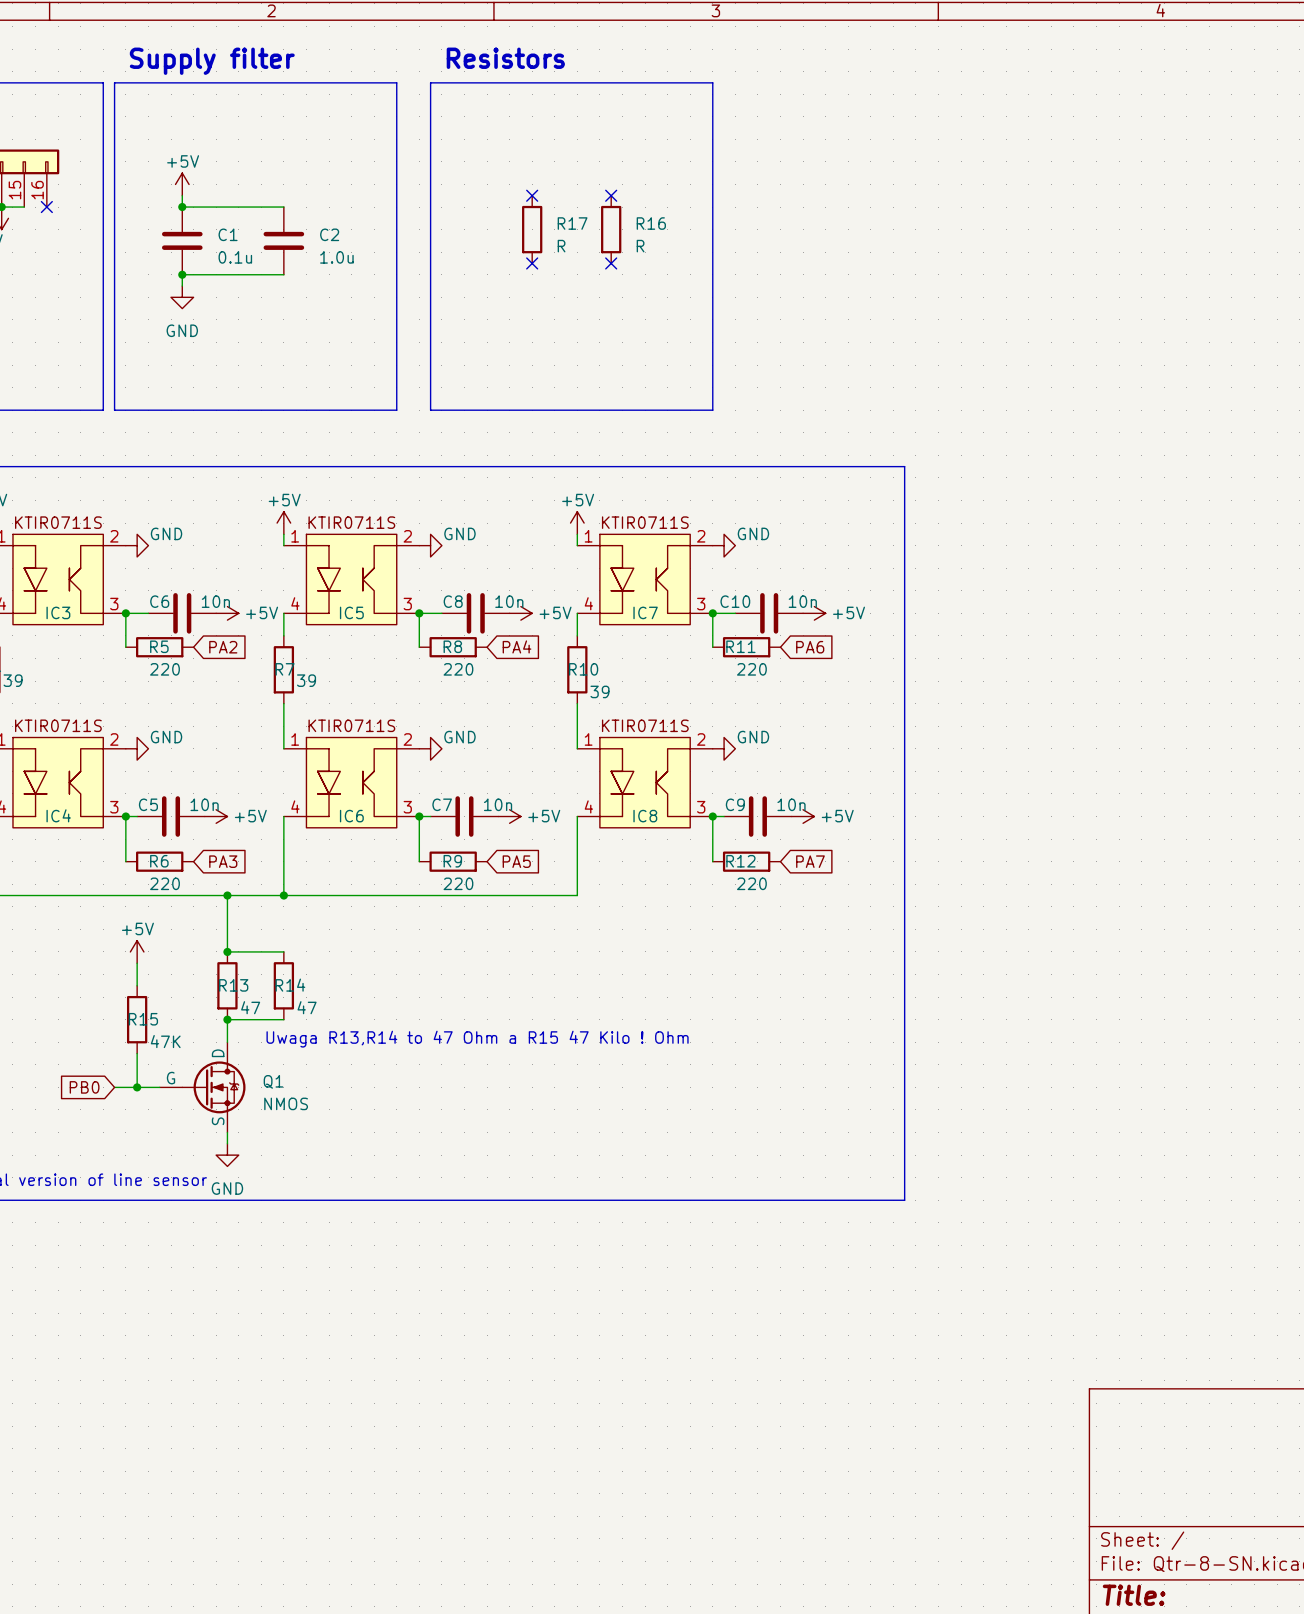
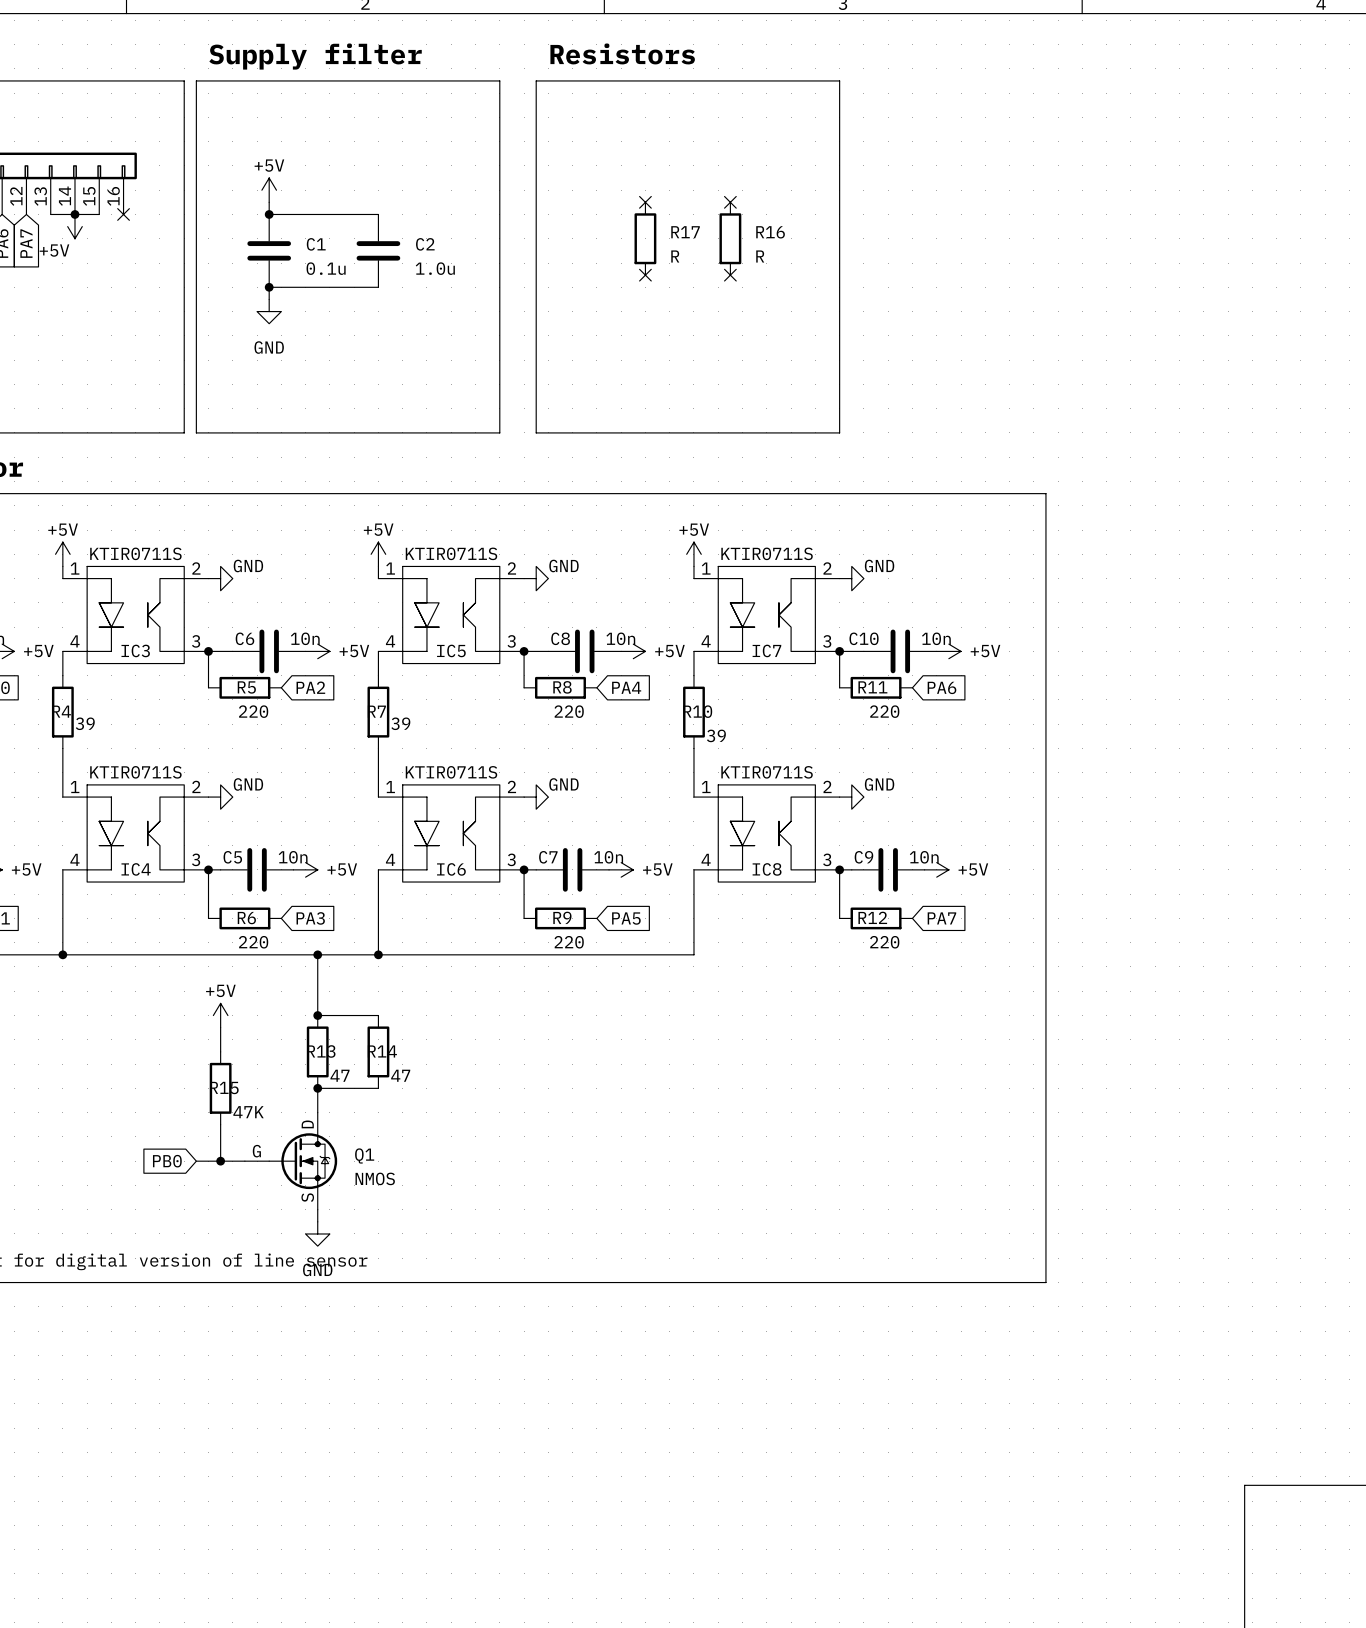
text: Uwaga R13,R14 to 47 Ohm a R15 47 Kilo ! Ohm (477, 1039) -> none

